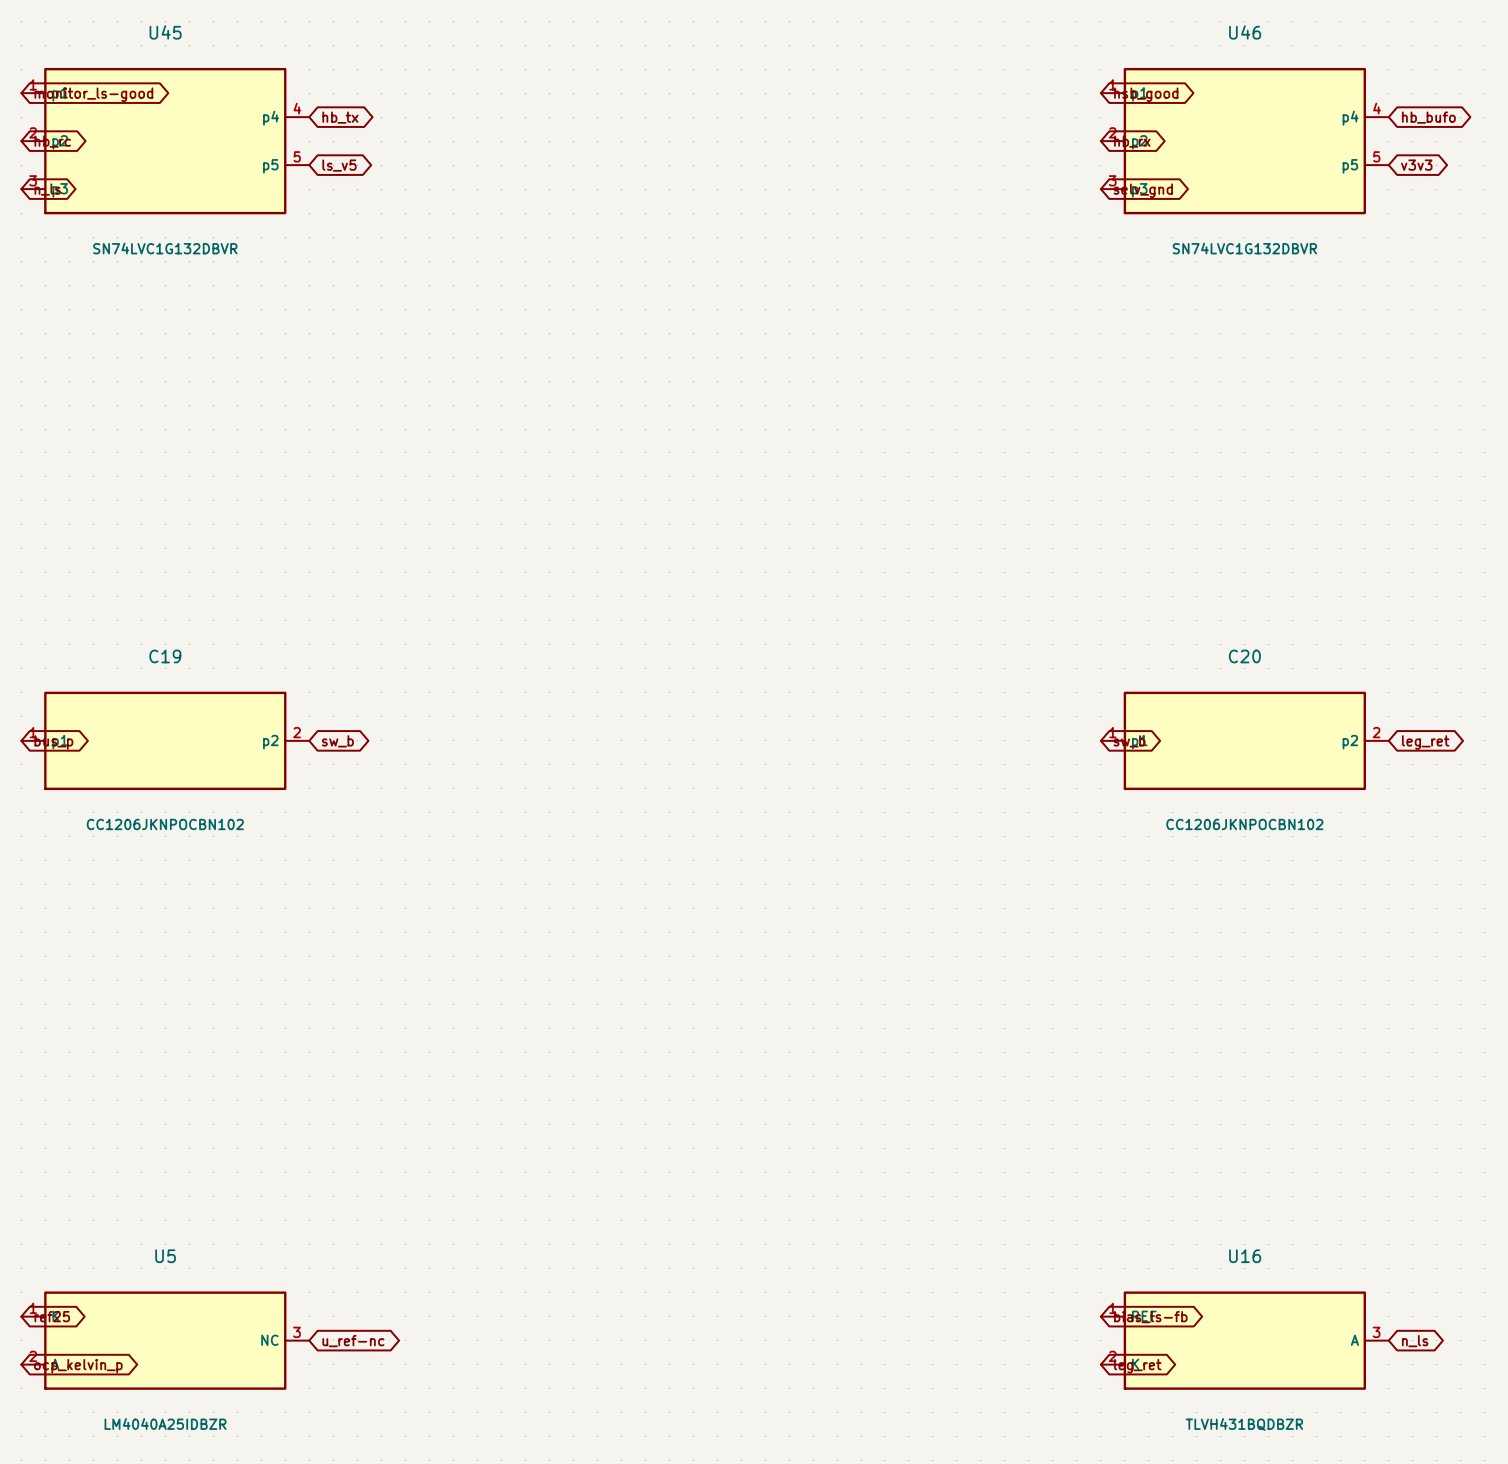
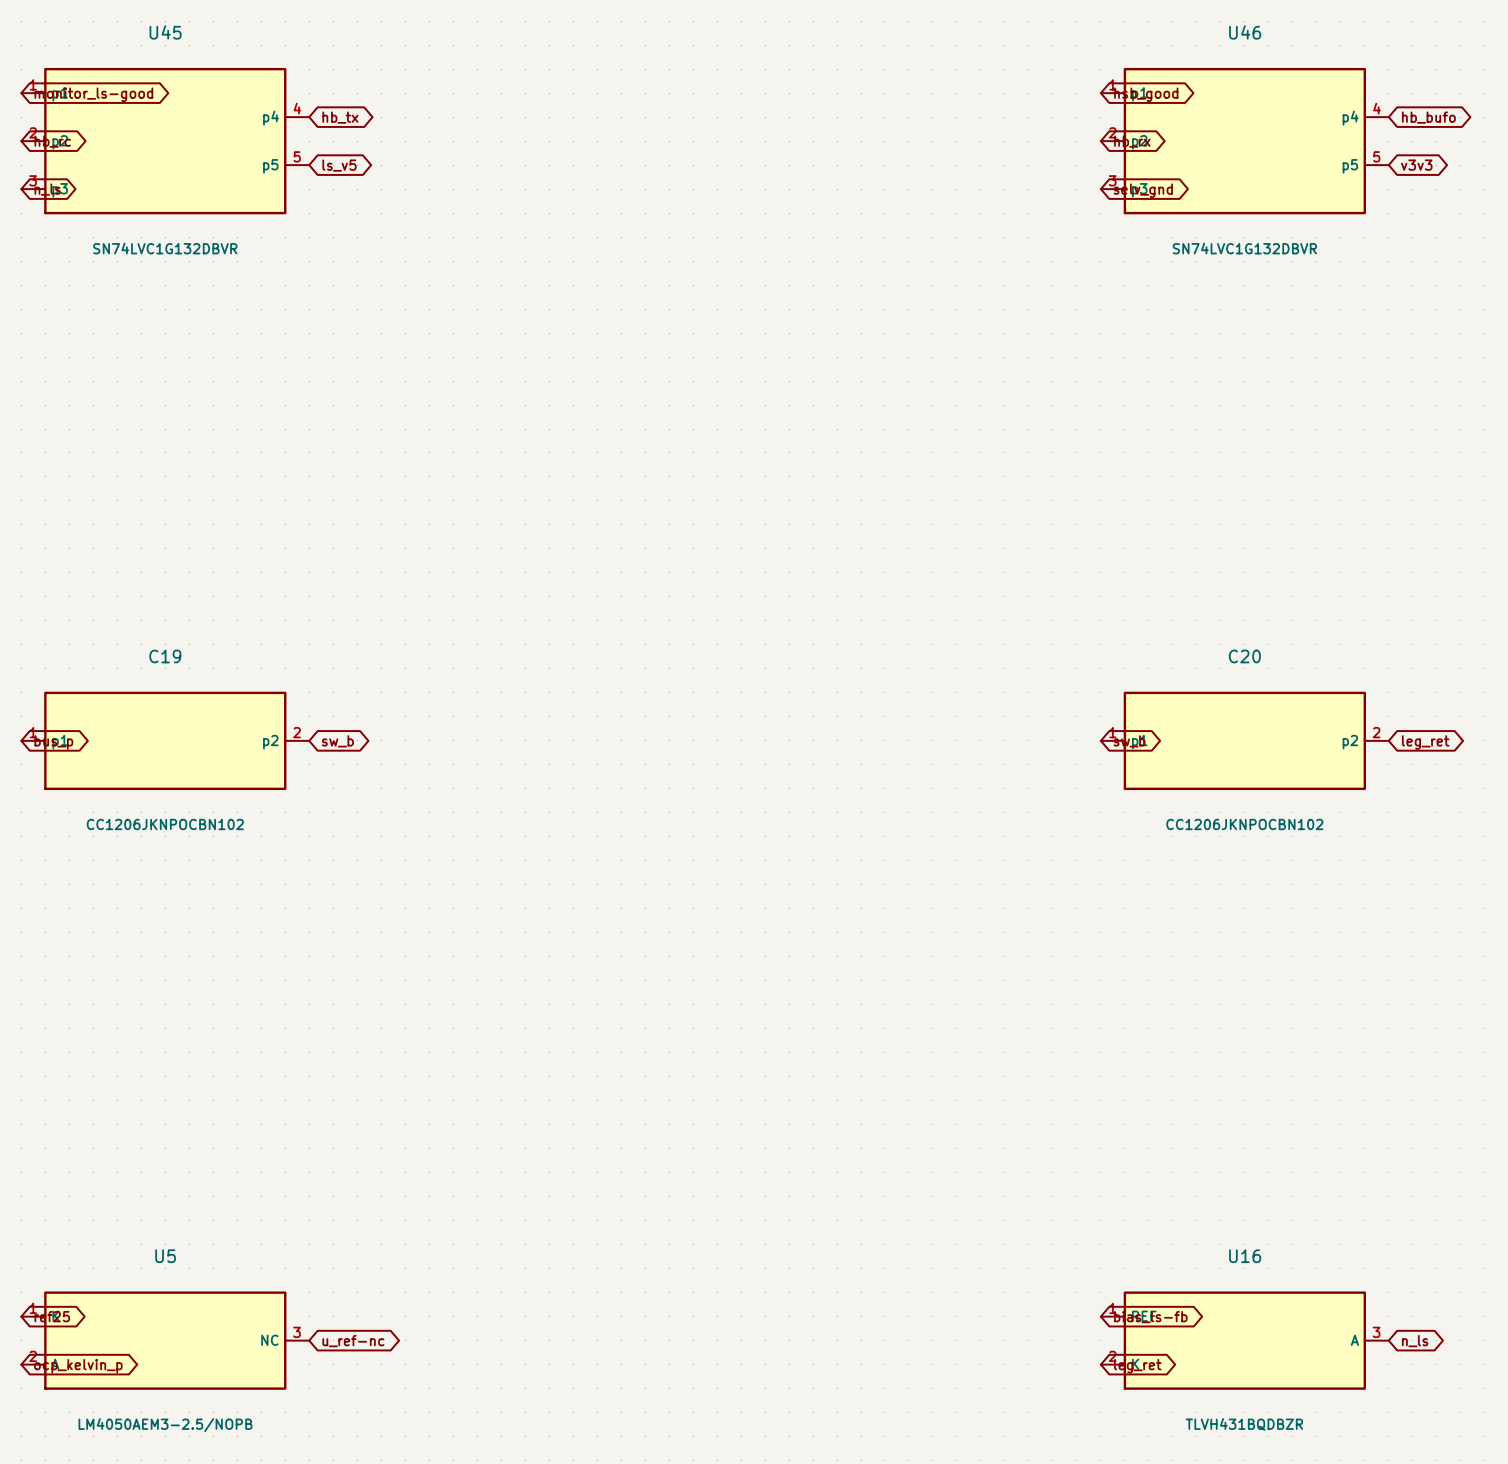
U5 value: LM4040A25IDBZR (165, 1424) -> LM4050AEM3-2.5/NOPB (165, 1425)

